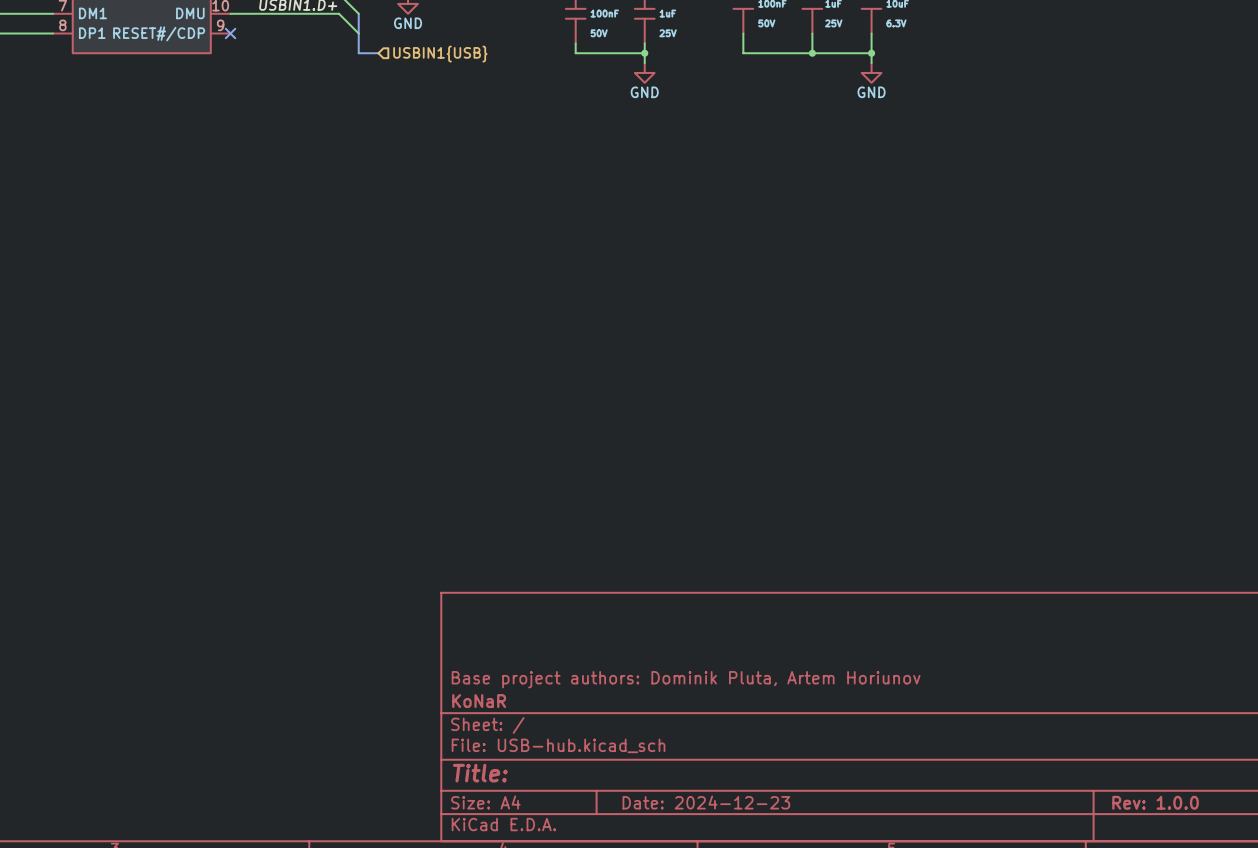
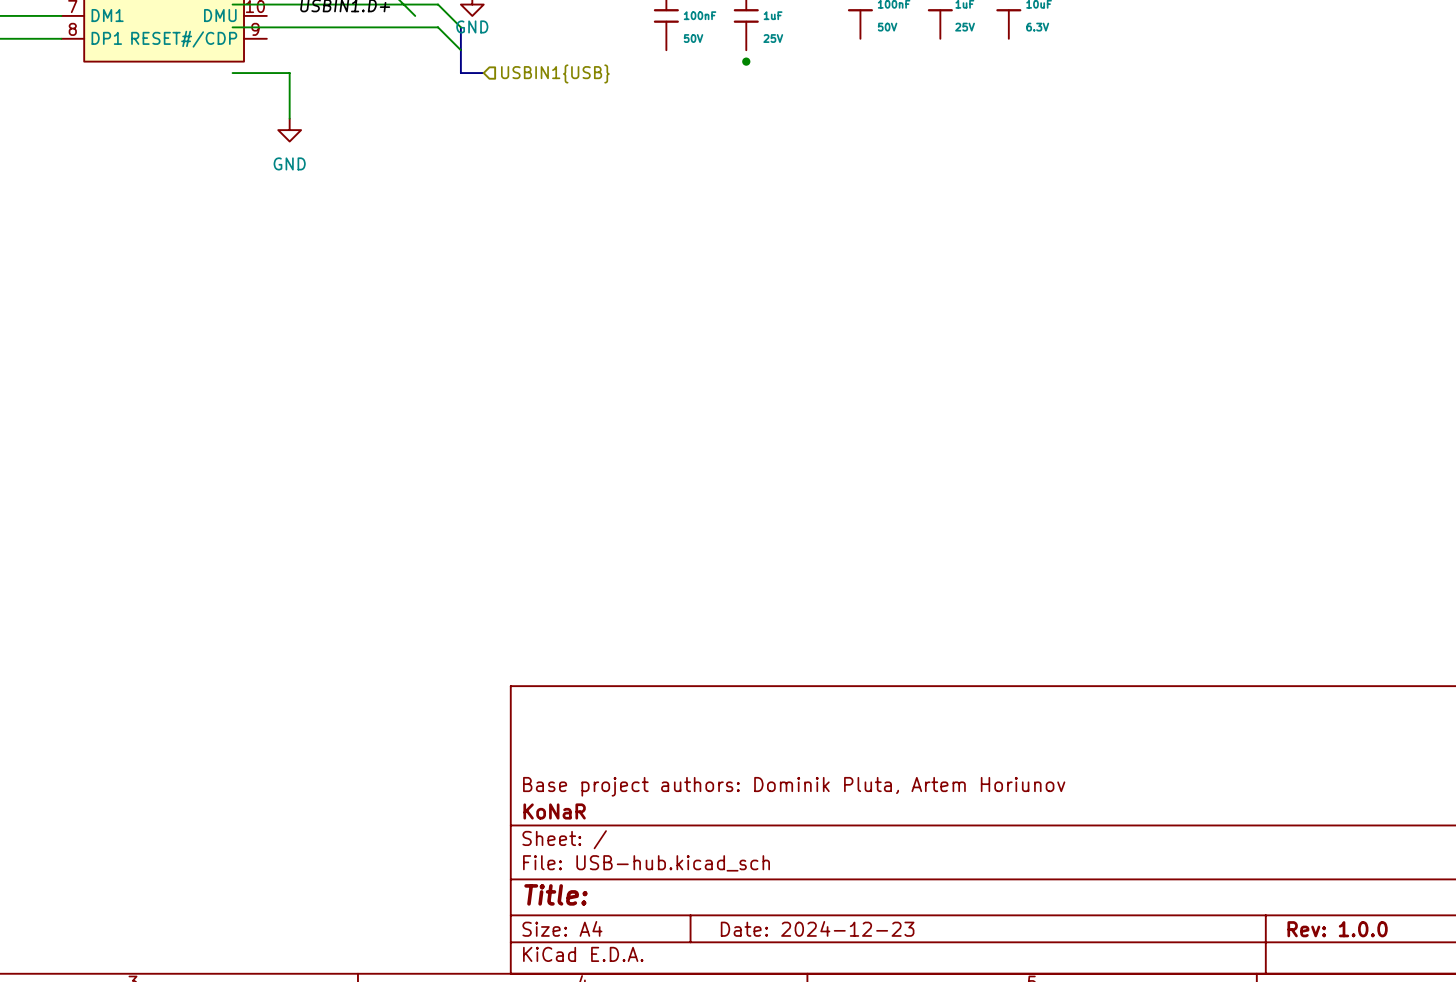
wire: none -> (232, 4) (438, 4) (460, 27)
wire: (230, 13) (339, 13) (358, 33) -> none
bus: (358, 13) (358, 53) (378, 53) -> (460, 27) (460, 73) (483, 73)
wire: none -> (232, 27) (438, 27) (460, 50)
no-connect mark: (230, 33) -> none
wire: (743, 33) (743, 53) (871, 53) -> none
wire: (812, 33) (812, 53) -> none
wire: (871, 33) (871, 63) -> none
wire: (575, 43) (575, 53) (644, 53) -> none
wire: (644, 43) (644, 63) -> none
junction: (812, 53) -> none
junction: (871, 53) -> none
hierarchical label position: USBIN1{USB} (440, 54) -> USBIN1{USB} (555, 73)
wire: none -> (232, 73) (289, 73) (289, 118)
power symbol: GND (644, 72) -> none
power symbol: GND (871, 72) -> none
power symbol: none -> GND (289, 130)

